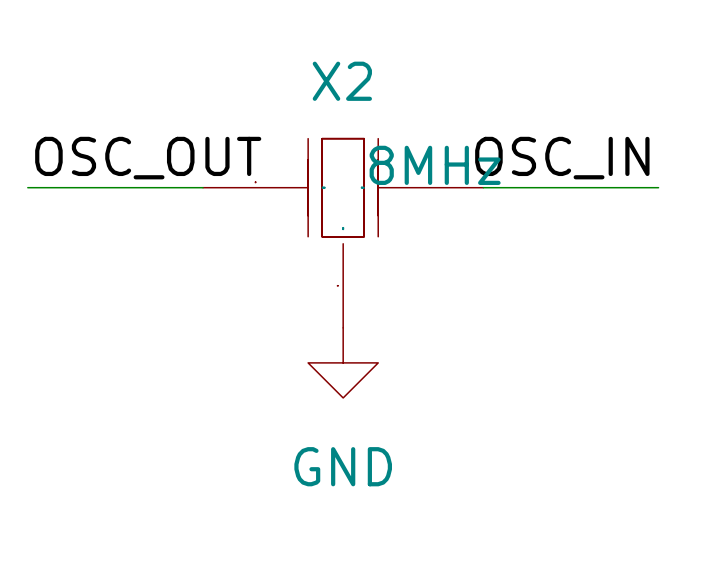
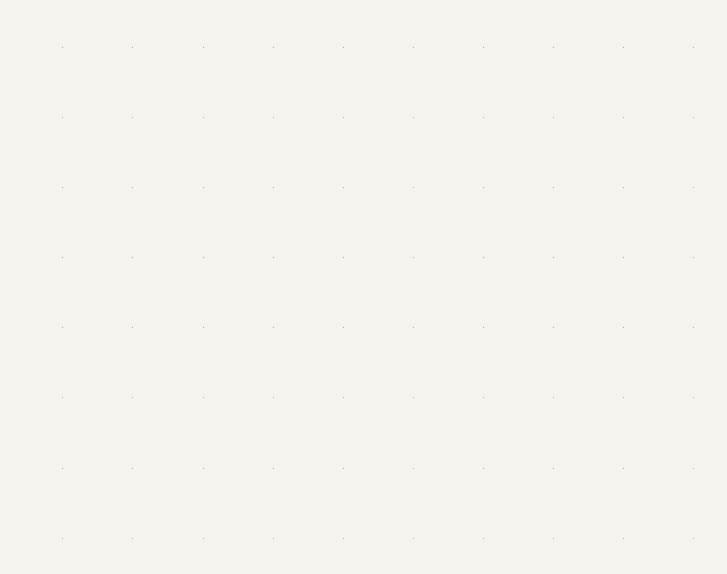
label: OSC_OUT (148, 158) -> none
label: OSC_IN (562, 158) -> none
wire: (27, 187) (203, 187) -> none
wire: (483, 187) (658, 187) -> none
X2: 8MHz (343, 233) -> none
power symbol: GND (343, 362) -> none

